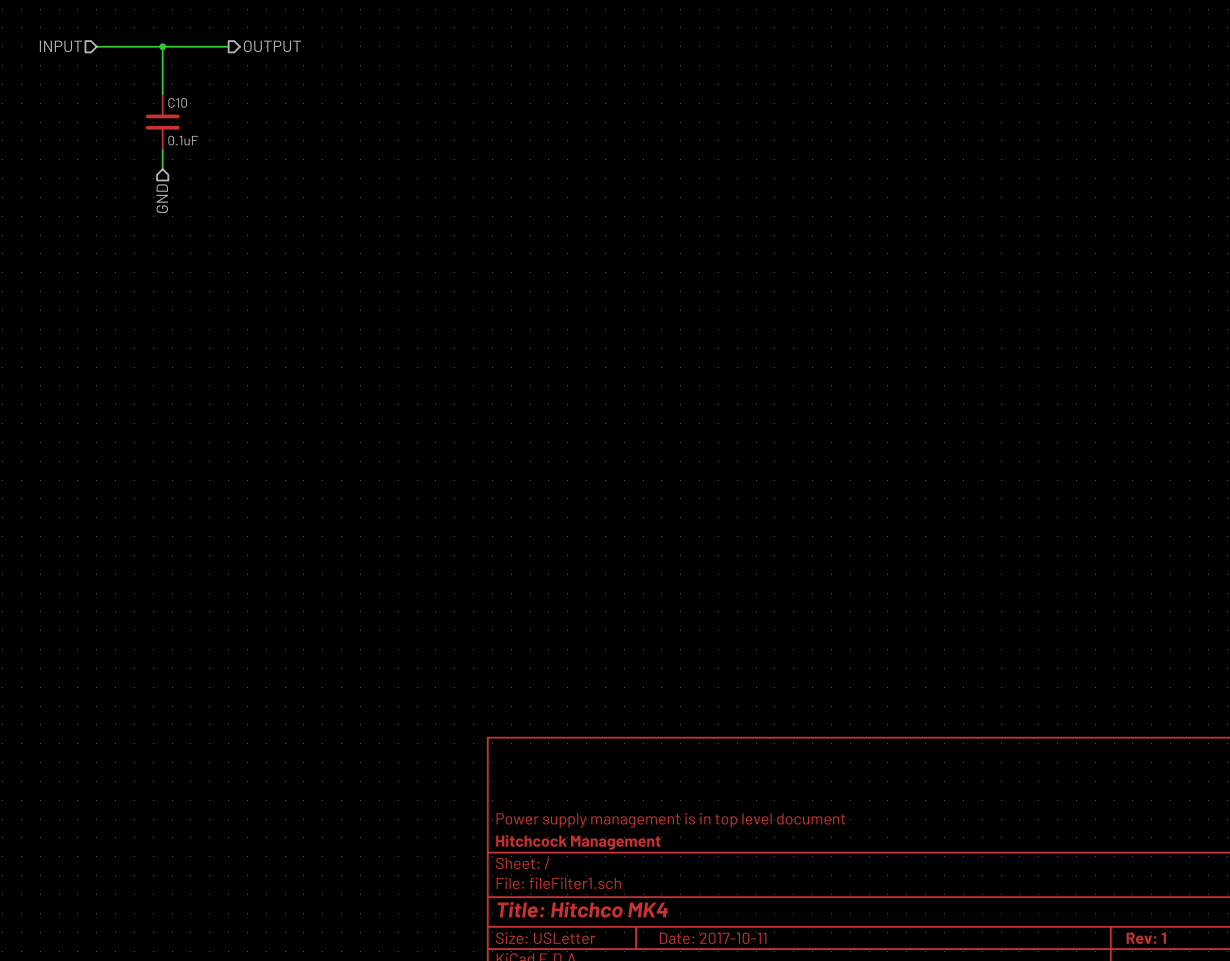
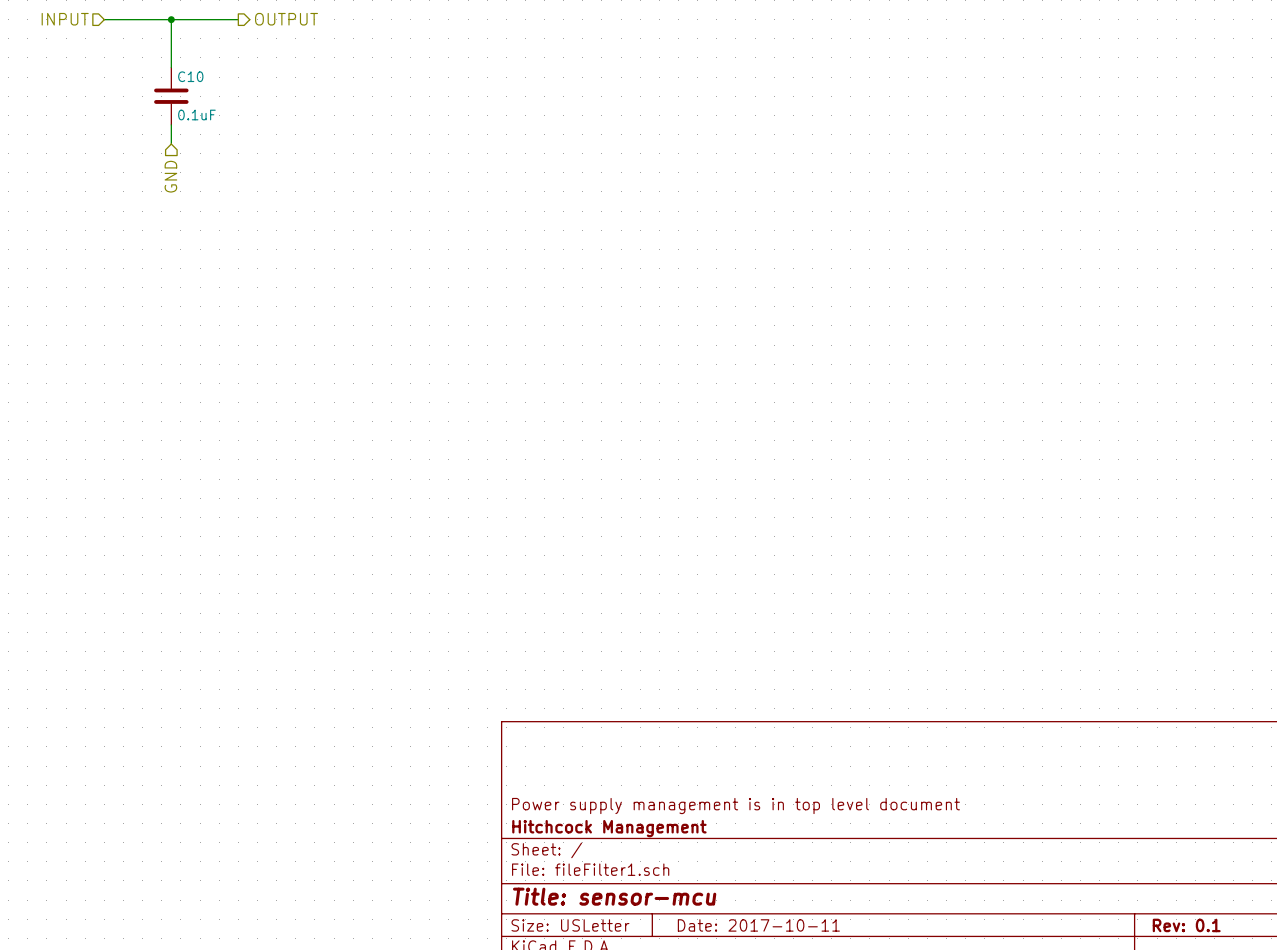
title block: Title: Hitchco MK4 (582, 909) -> Title: sensor-mcu (614, 896)
title block: Rev: 1 (1146, 938) -> Rev: 0.1 (1186, 925)

